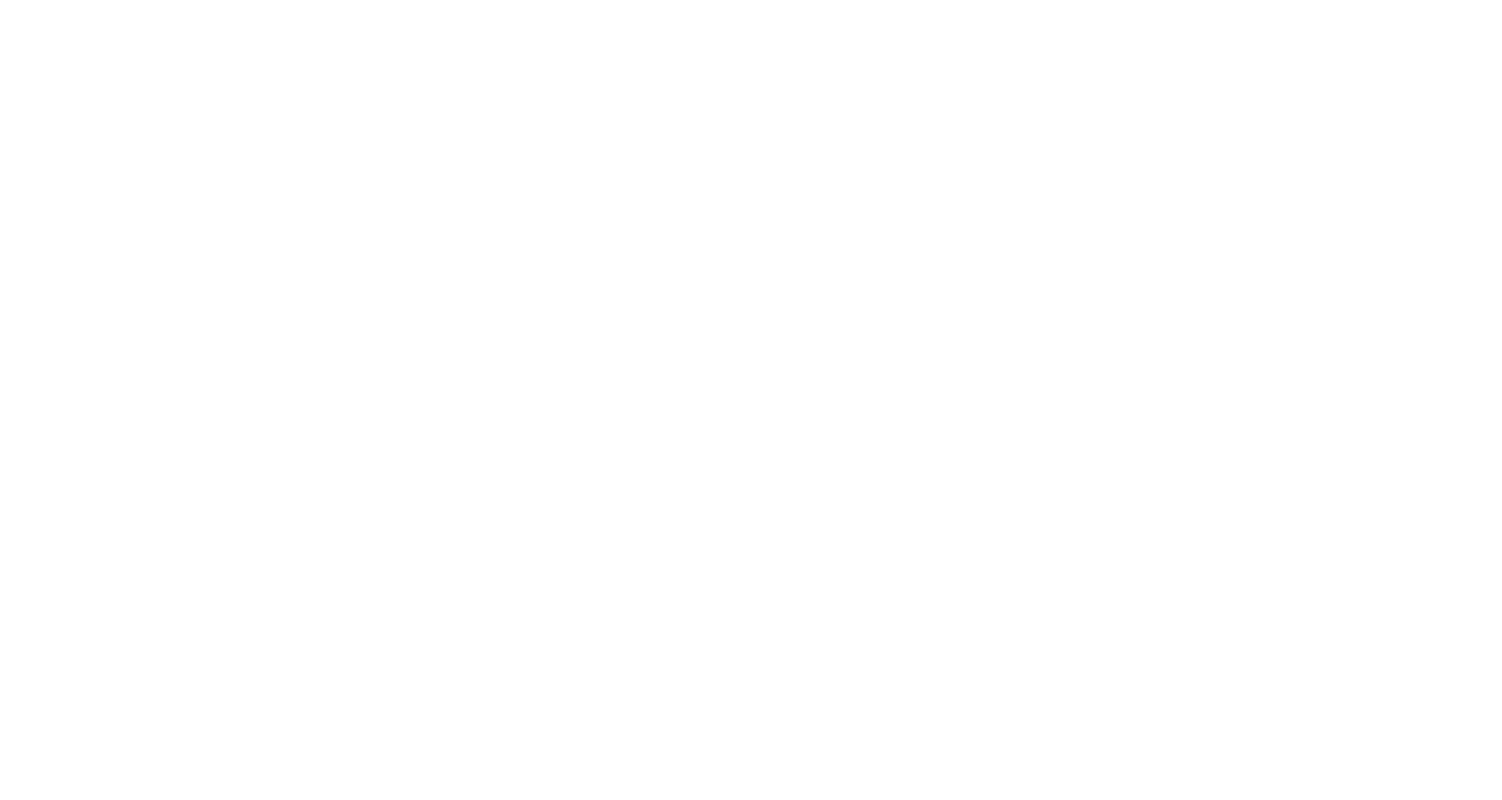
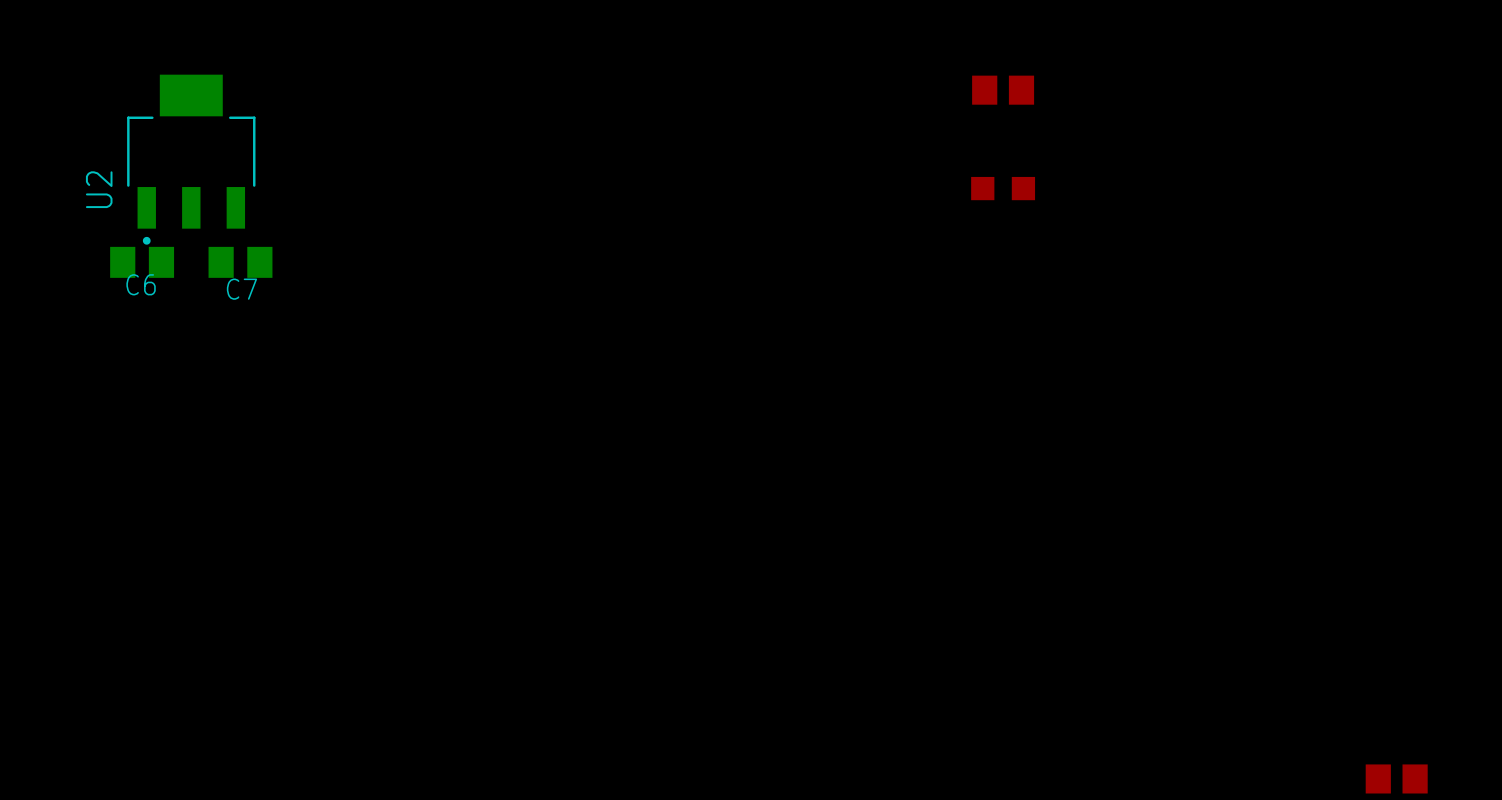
part: none -> (1003, 90)
U2: none -> (191, 159)
part: none -> (1003, 188)
C6: none -> (142, 262)
C7: none -> (240, 262)
part: none -> (1396, 778)

